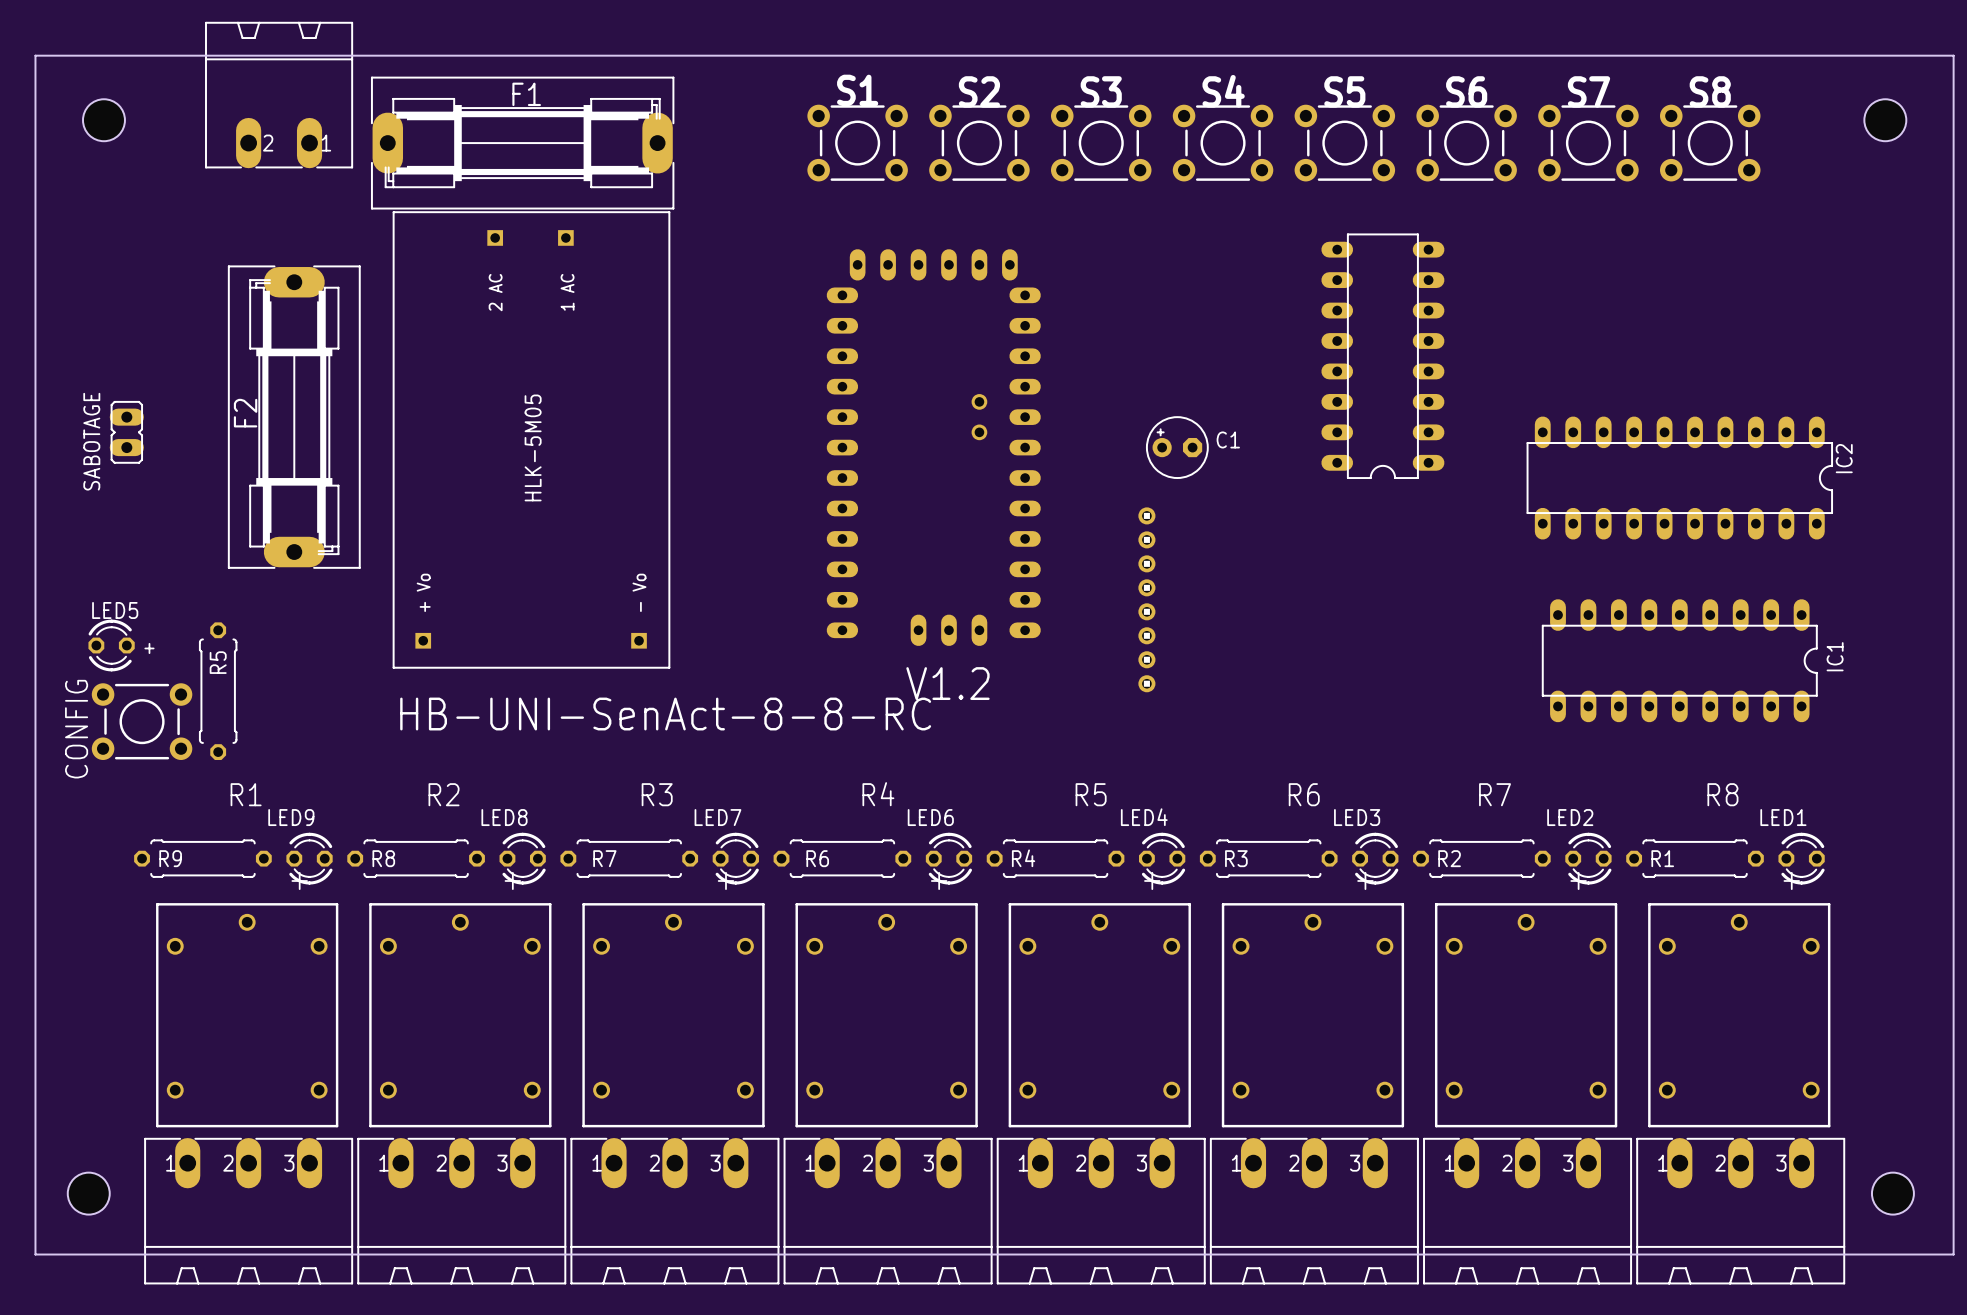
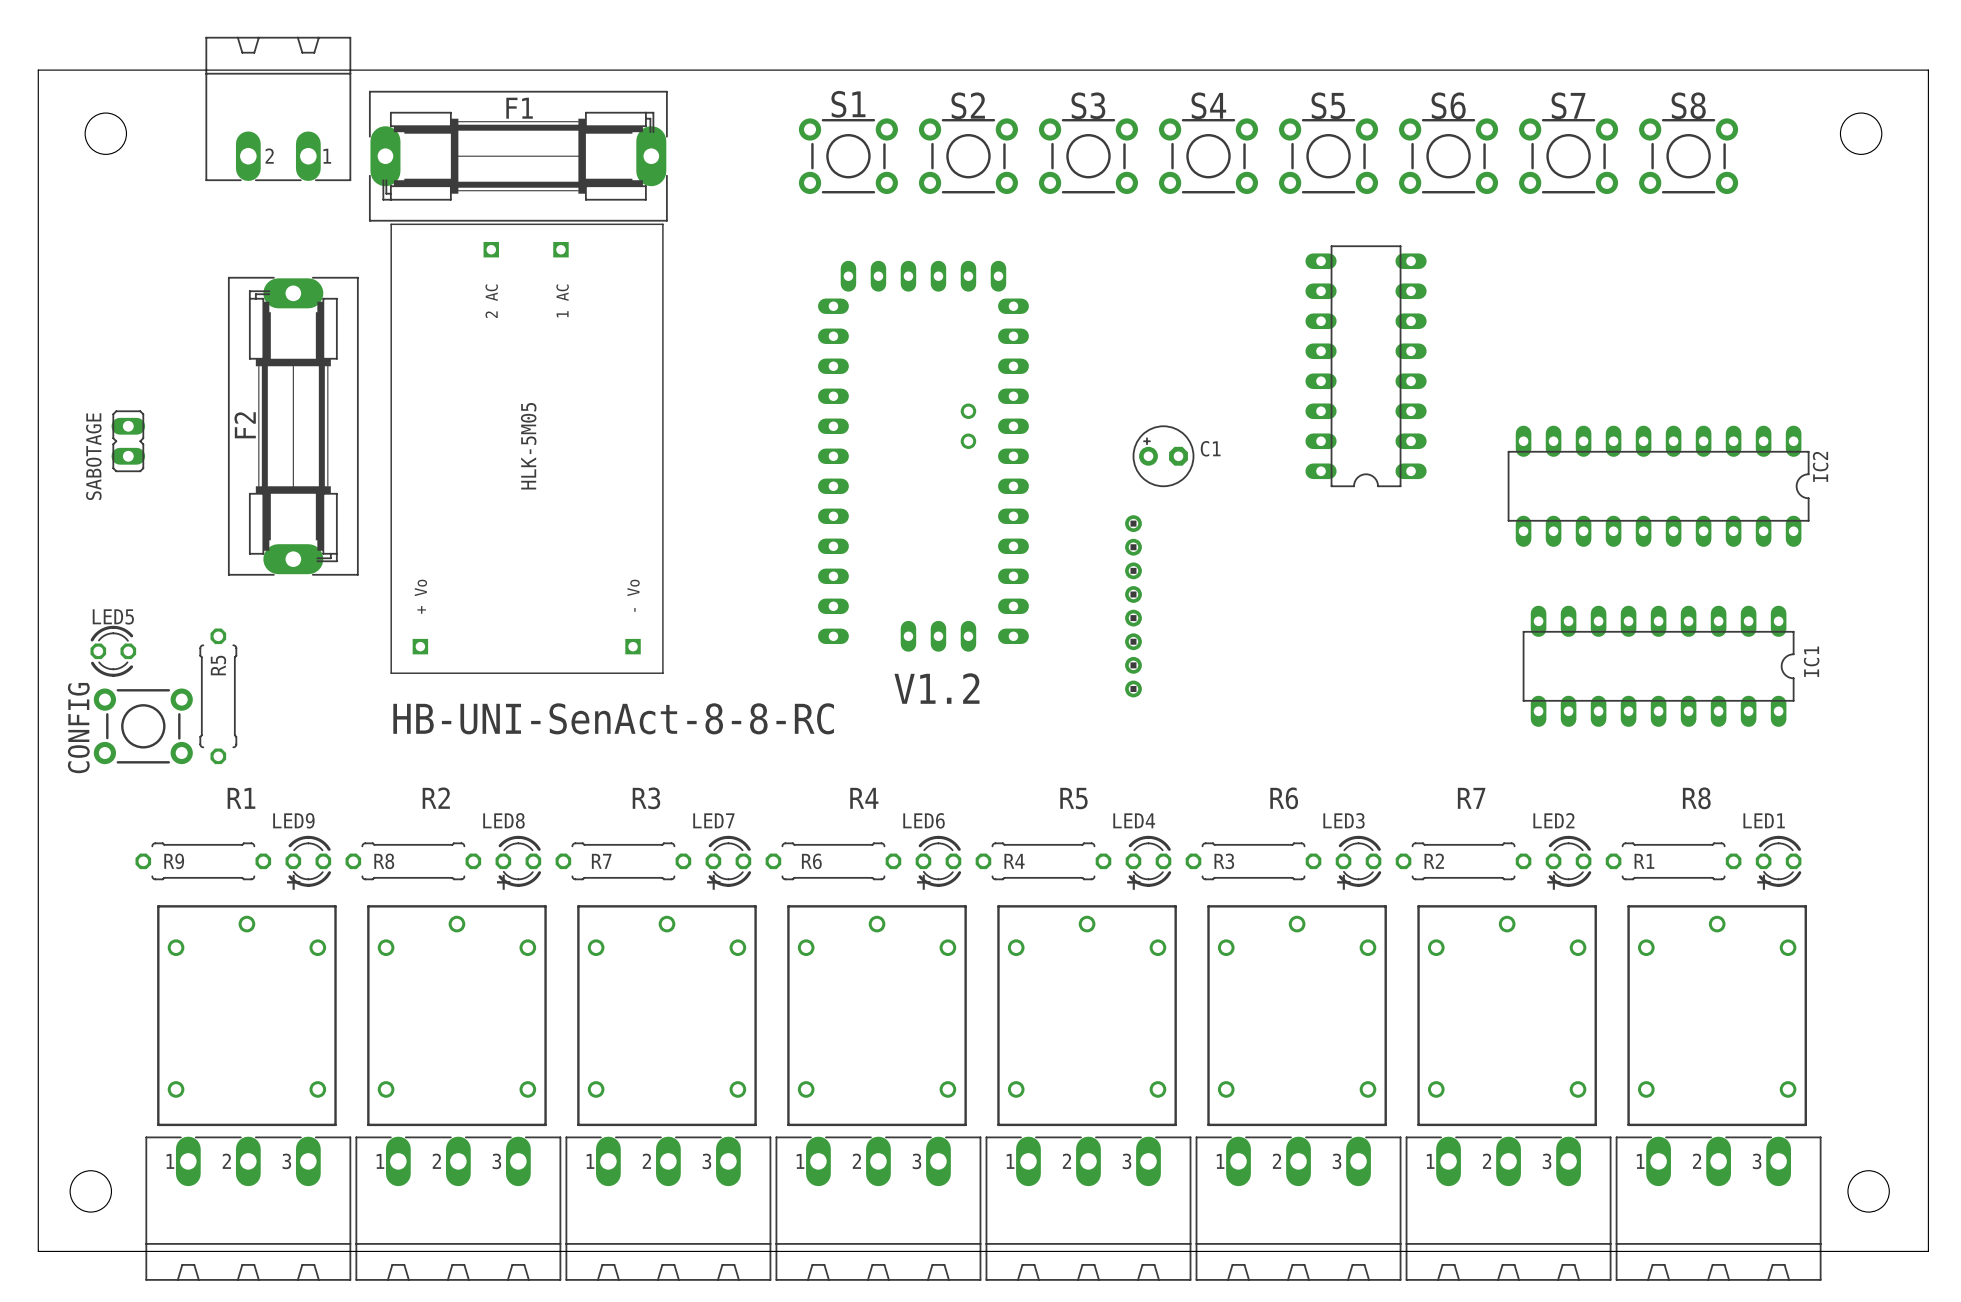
text: + (149, 648) -> none

